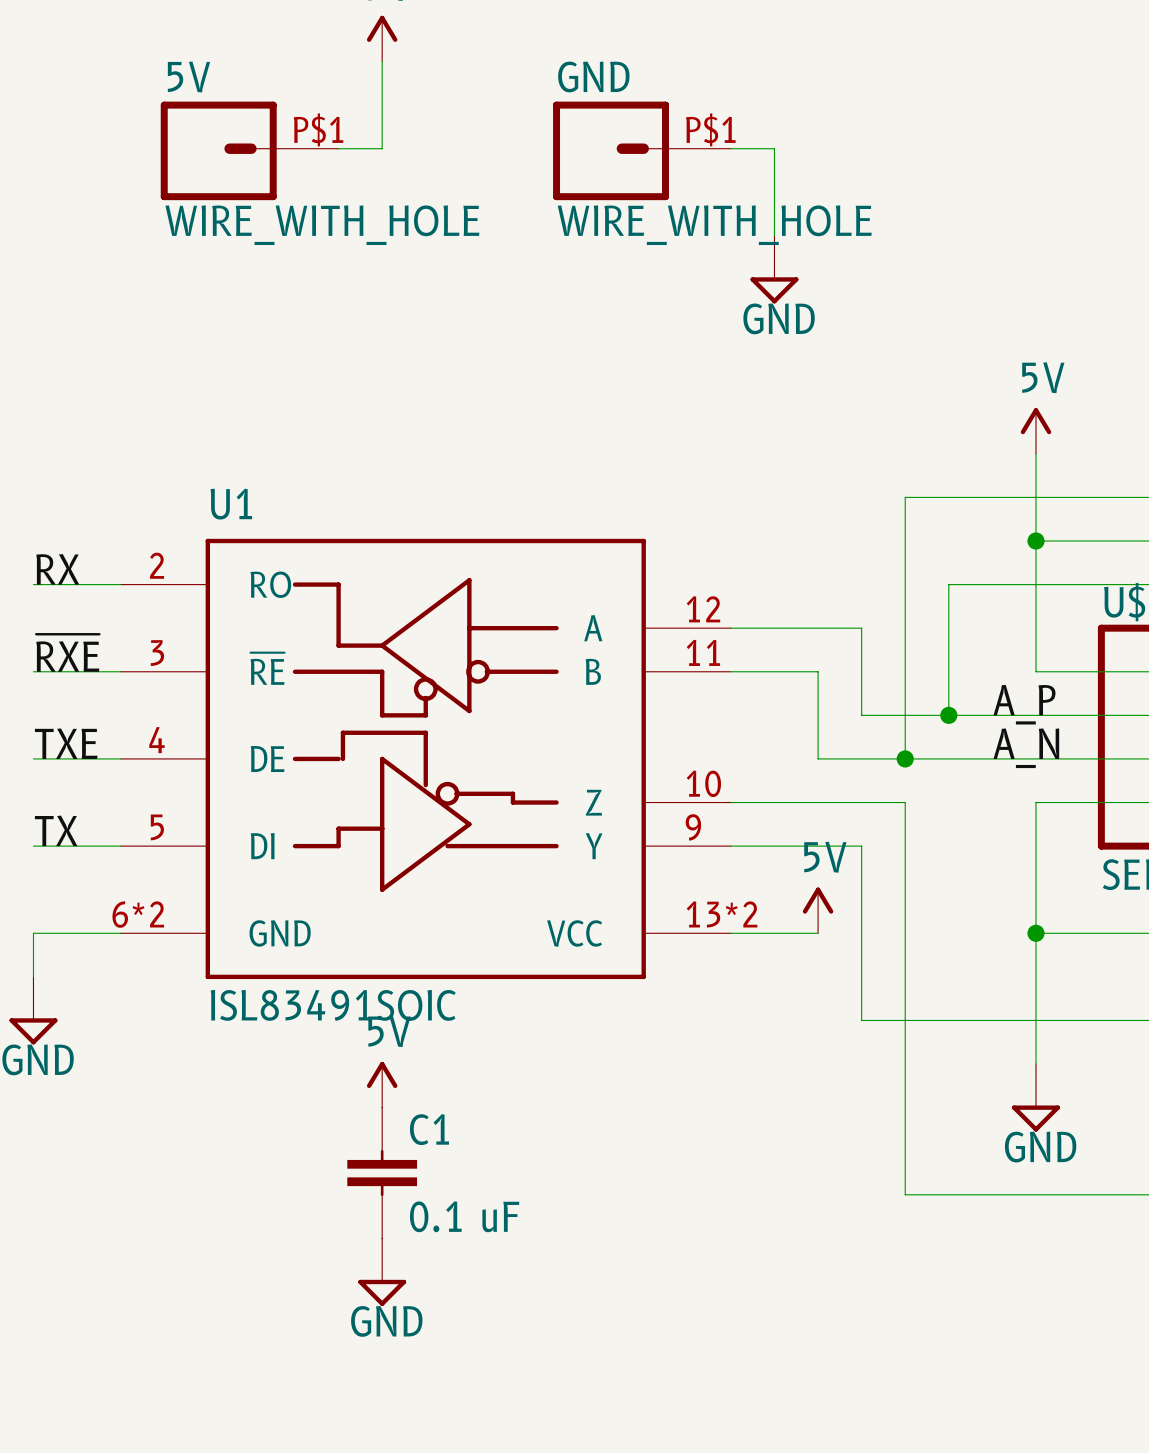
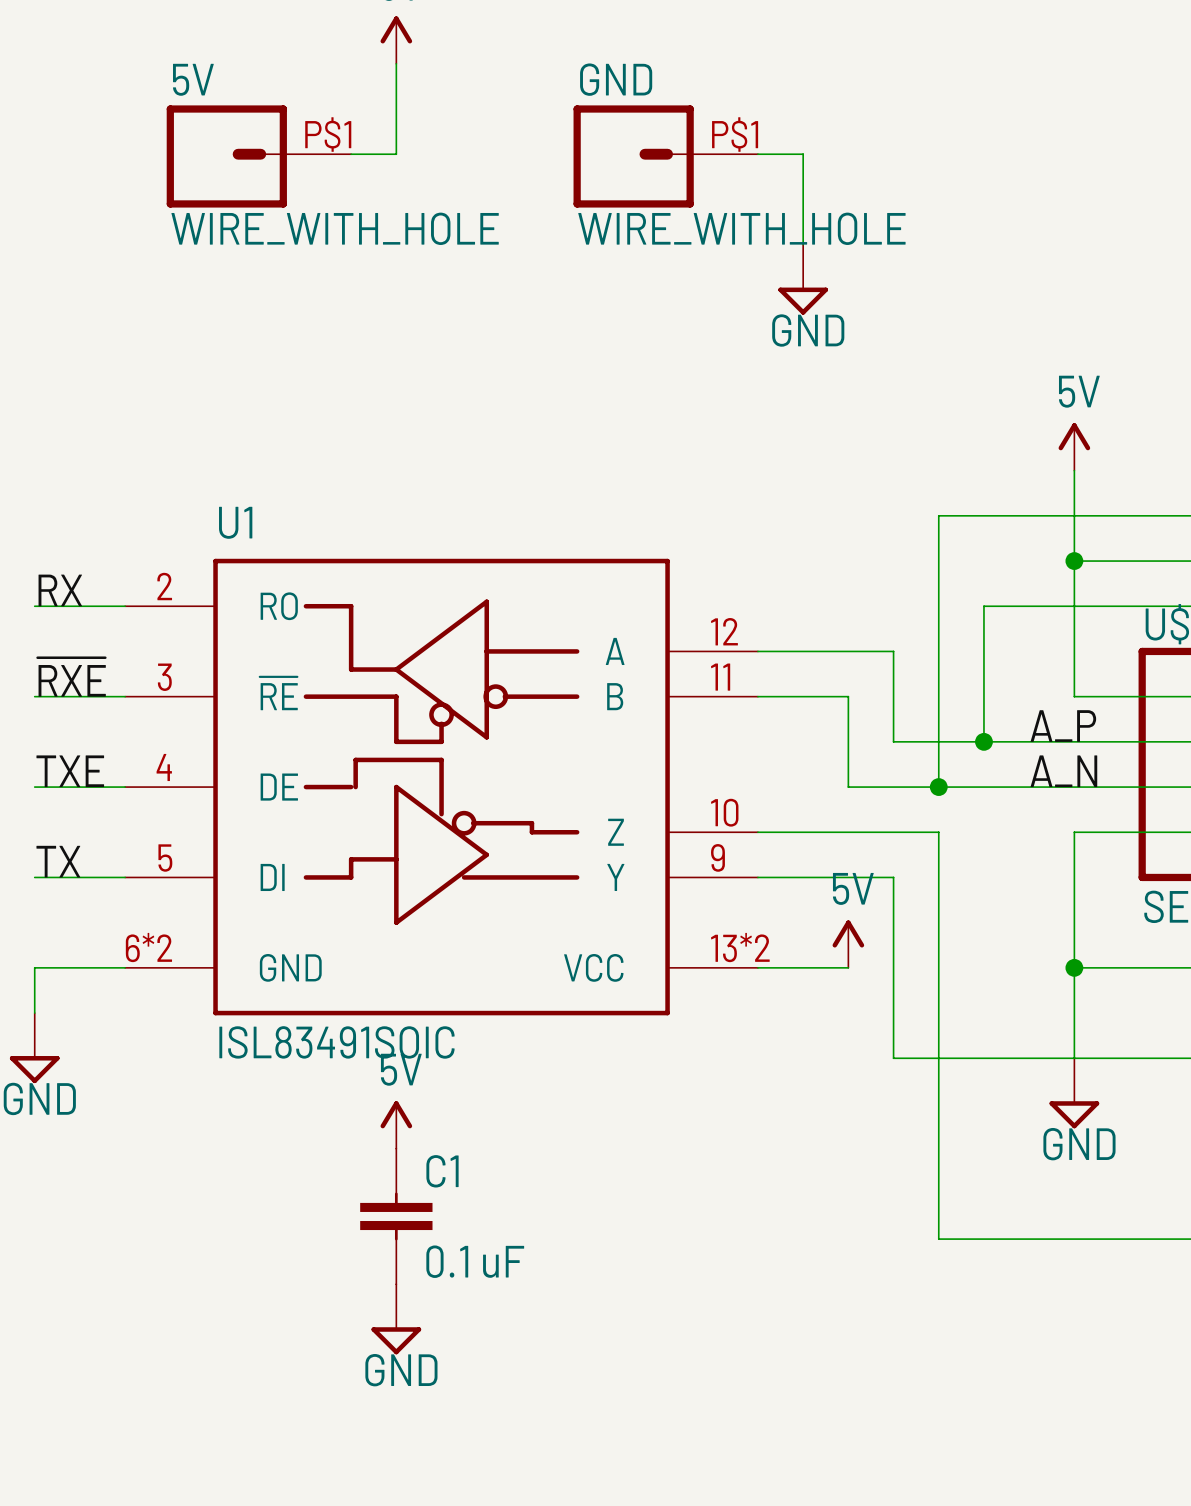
power symbol position: GND (1036, 1097) -> GND (1074, 1093)

